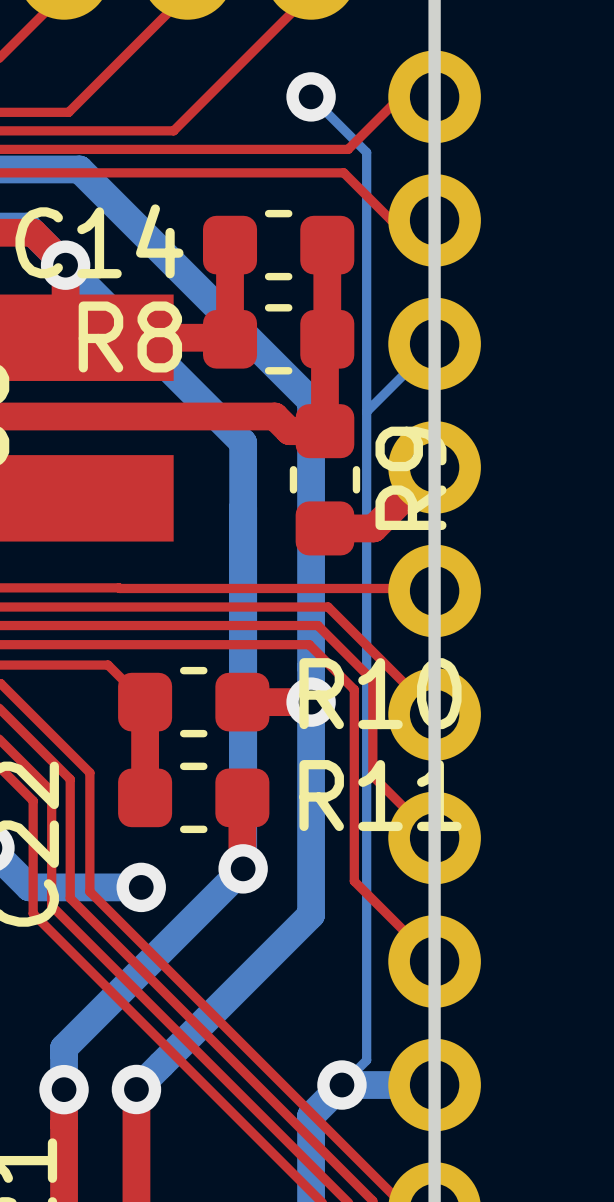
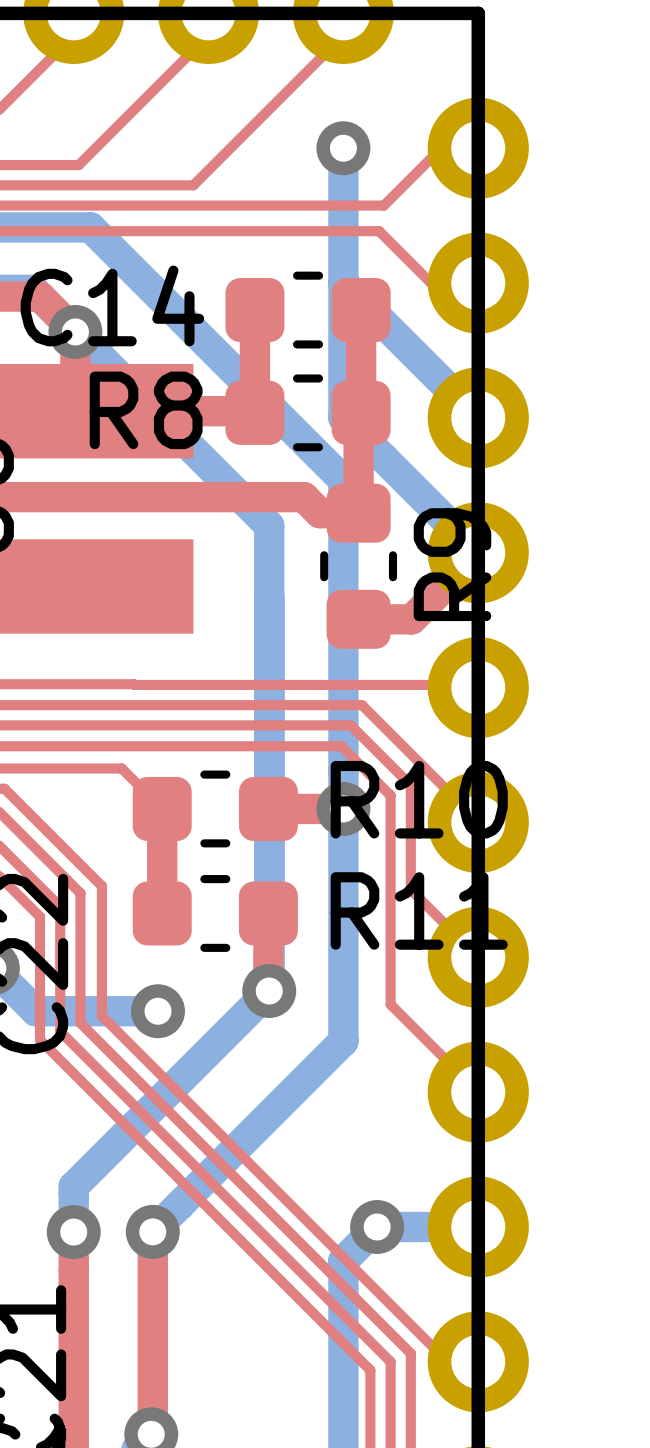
bottom track: (311, 96) (366, 152) (366, 1060) (341, 1085) -> (343, 148) (343, 417) (446, 520)
bottom track: none -> (343, 283) (446, 385)
bottom track: (414, 364) (366, 411) -> none

